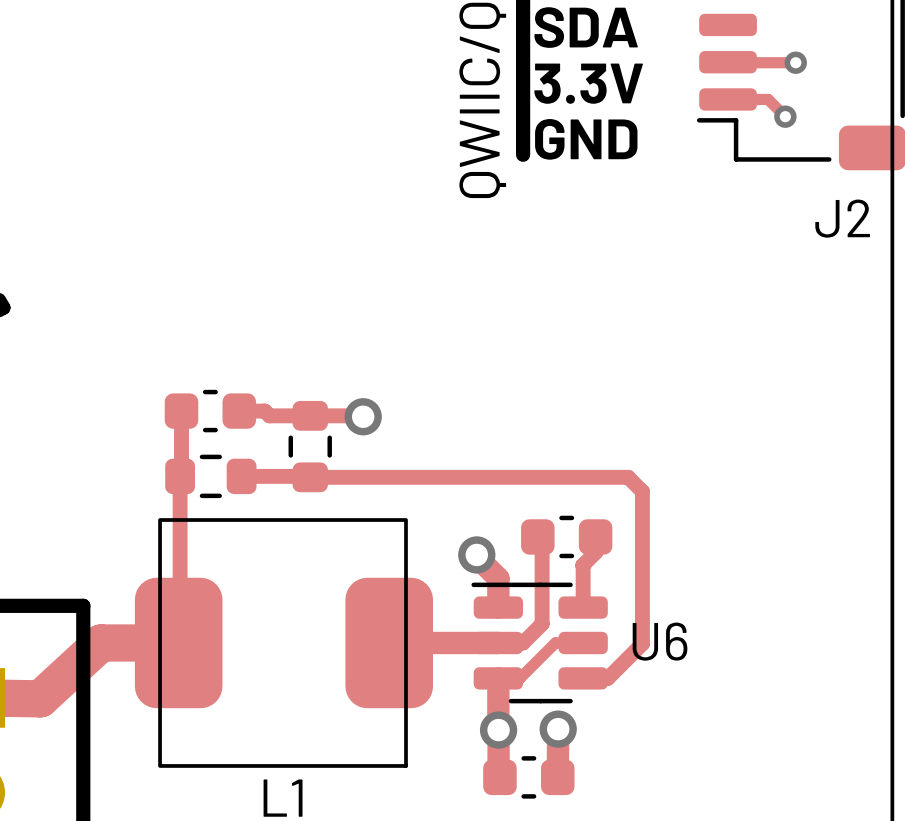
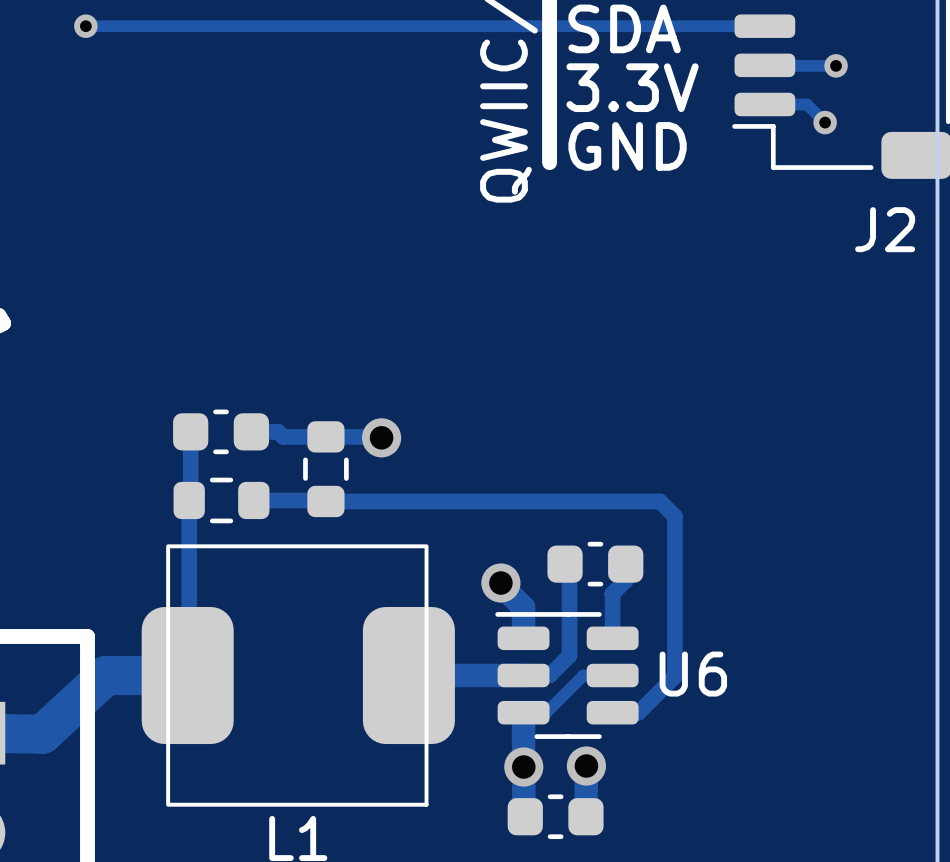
track: none -> (85, 26) (764, 26)
via: none -> (85, 26)

